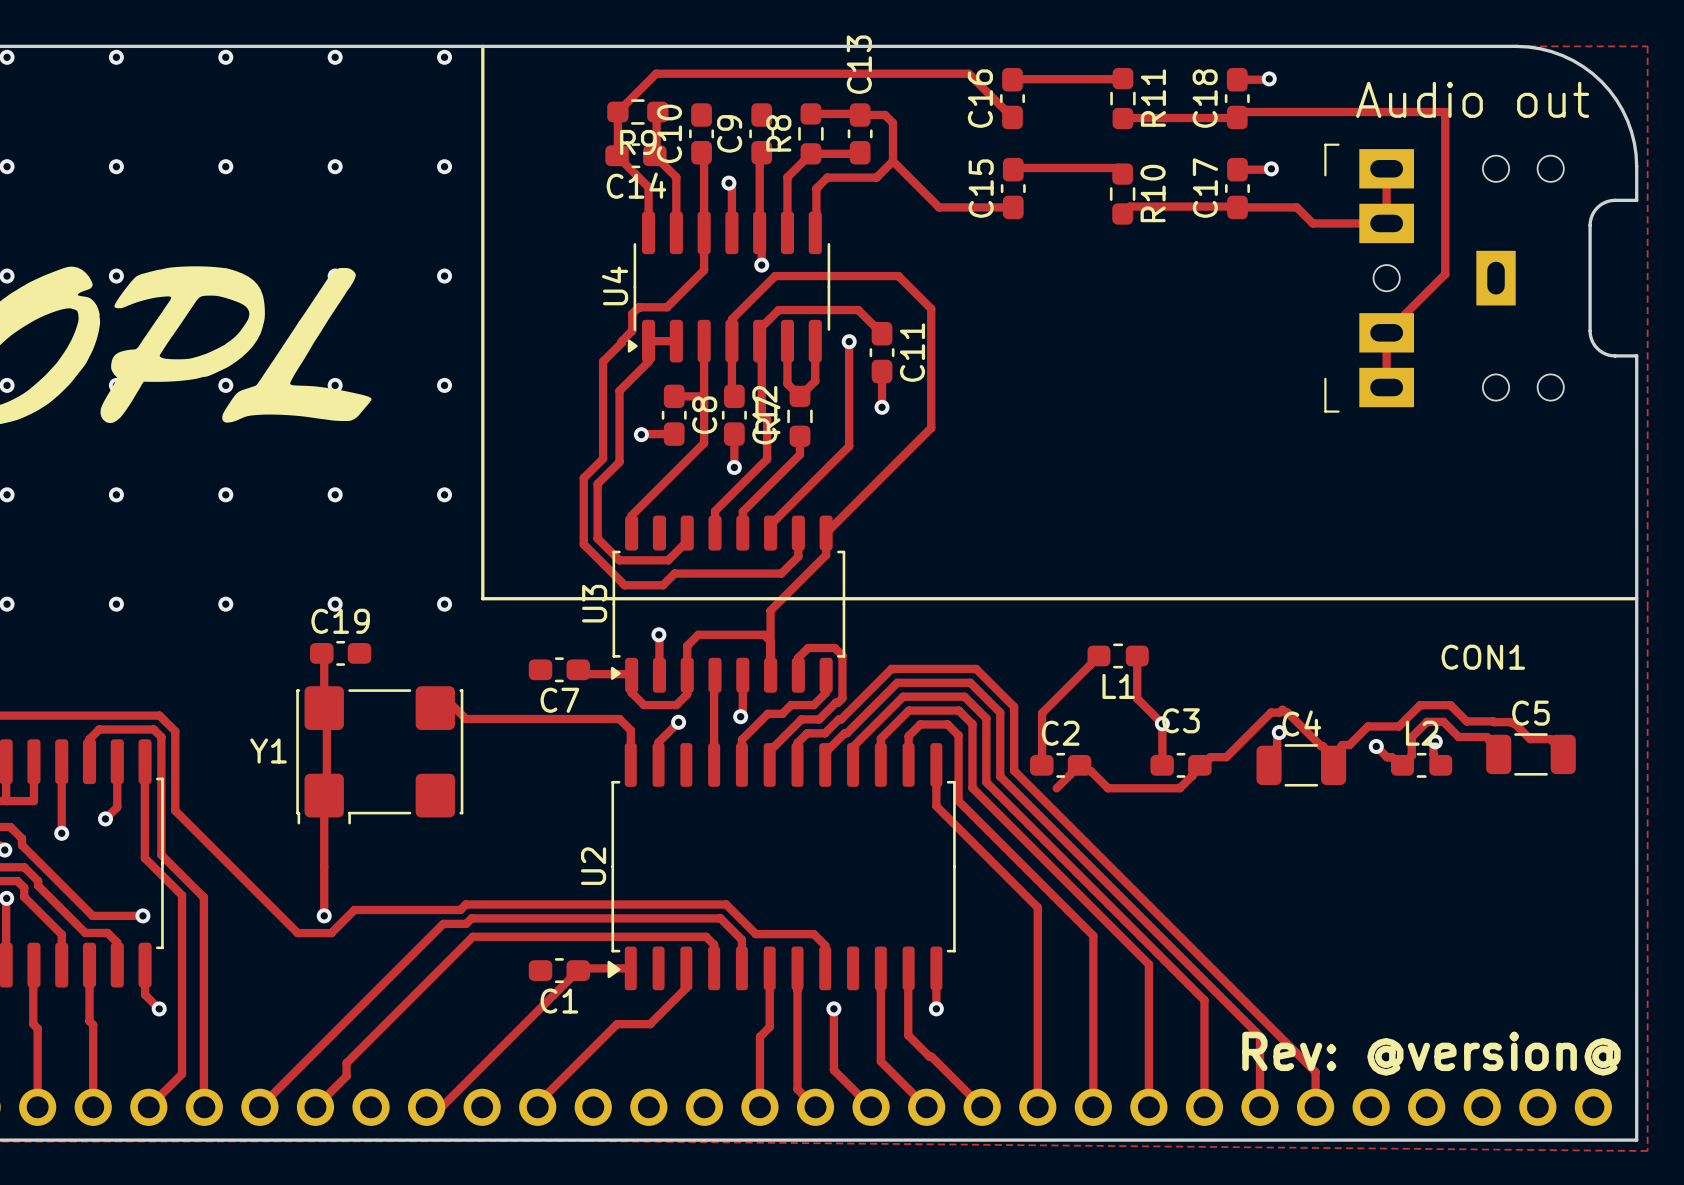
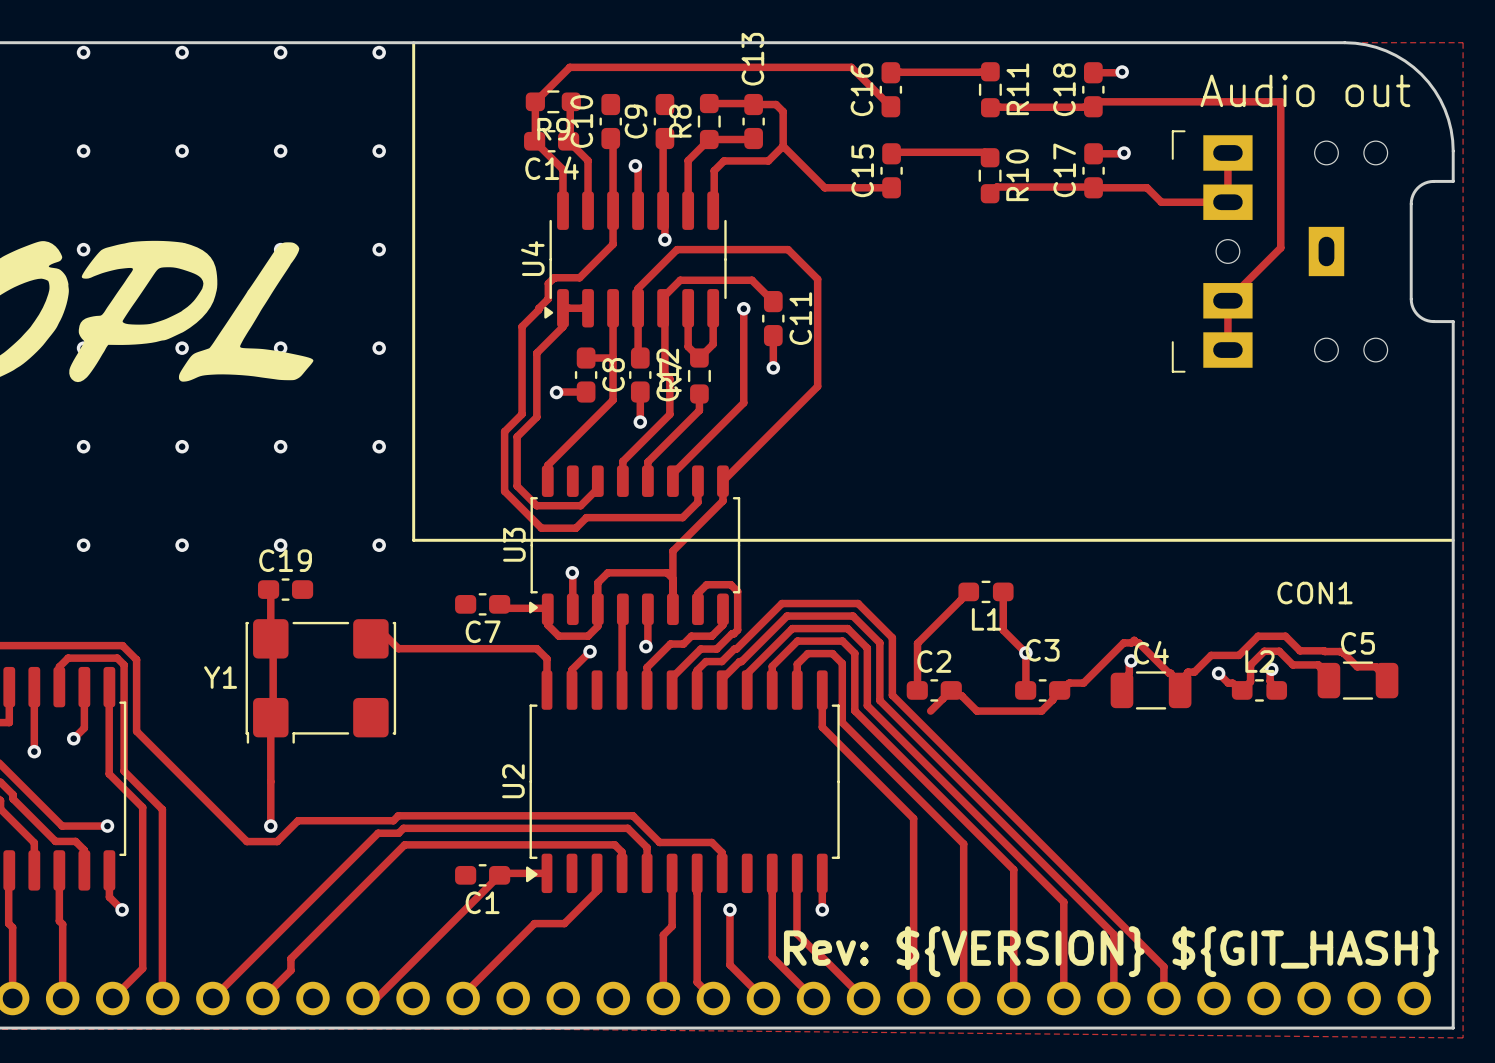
text: Rev: @version@ (1431, 1053) -> Rev: ${VERSION} ${GIT_HASH} (1111, 951)

